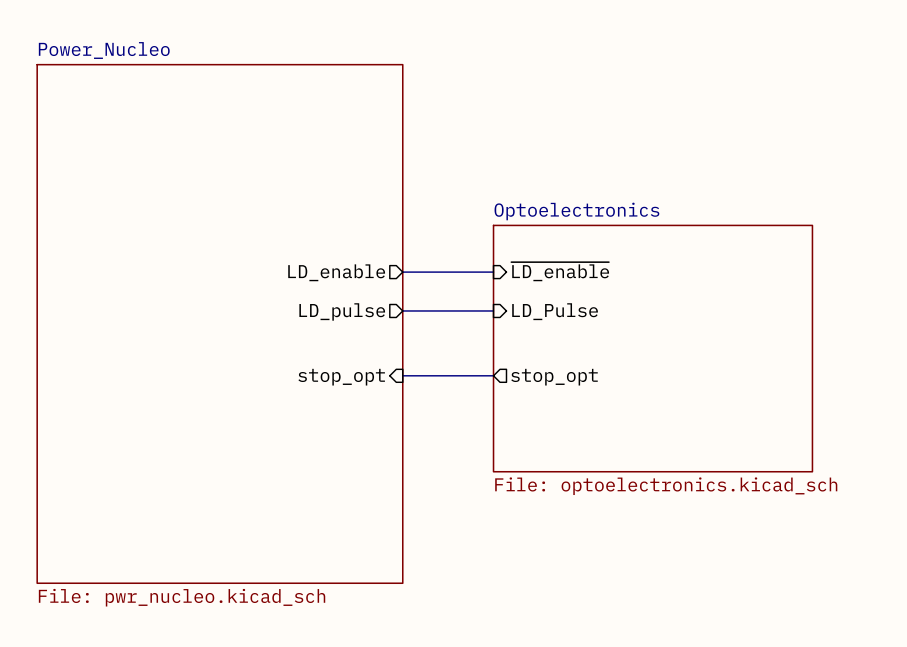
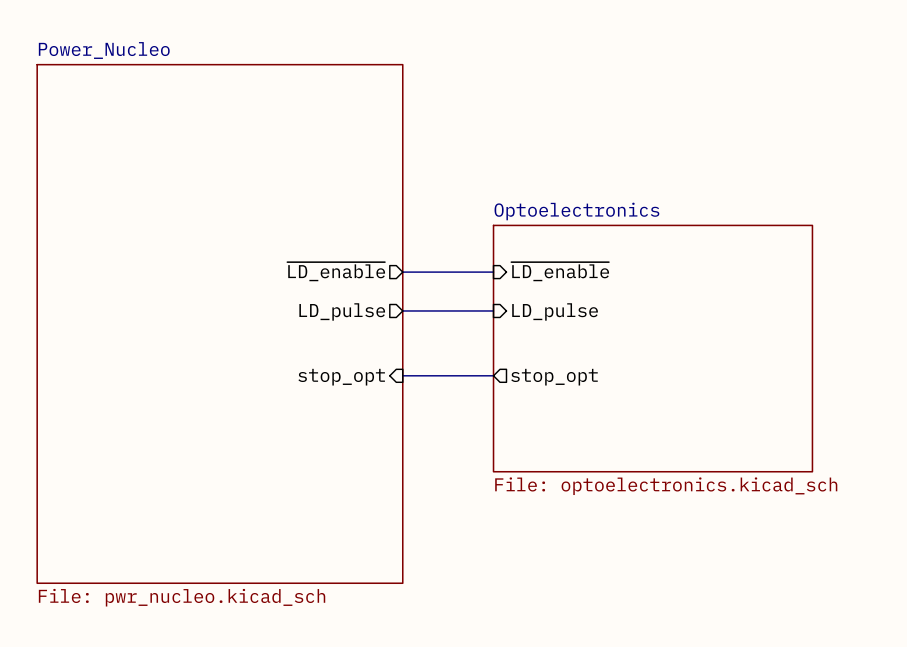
sheet pin: LD_enable (336, 272) -> ~{LD_enable} (336, 271)
sheet pin: LD_Pulse (555, 311) -> LD_pulse (555, 311)

